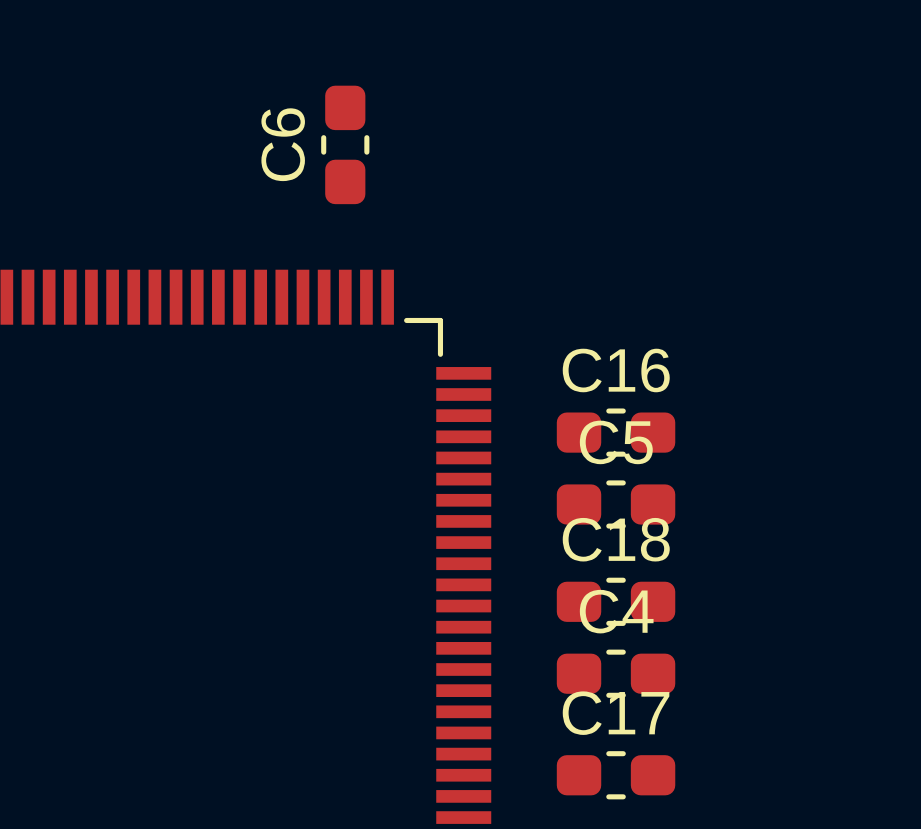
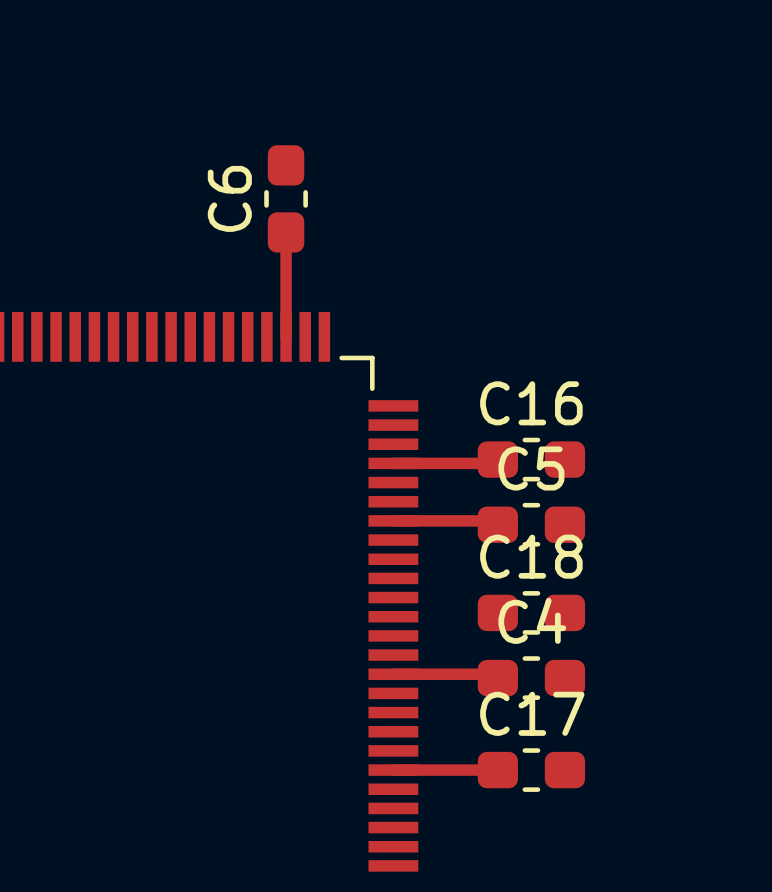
top track: none -> (286, 232) (286, 336)
top track: none -> (497, 459) (494, 463) (393, 463)
top track: none -> (393, 520) (494, 520) (497, 524)
top track: none -> (393, 674) (494, 674) (497, 678)
top track: none -> (393, 770) (497, 770)

